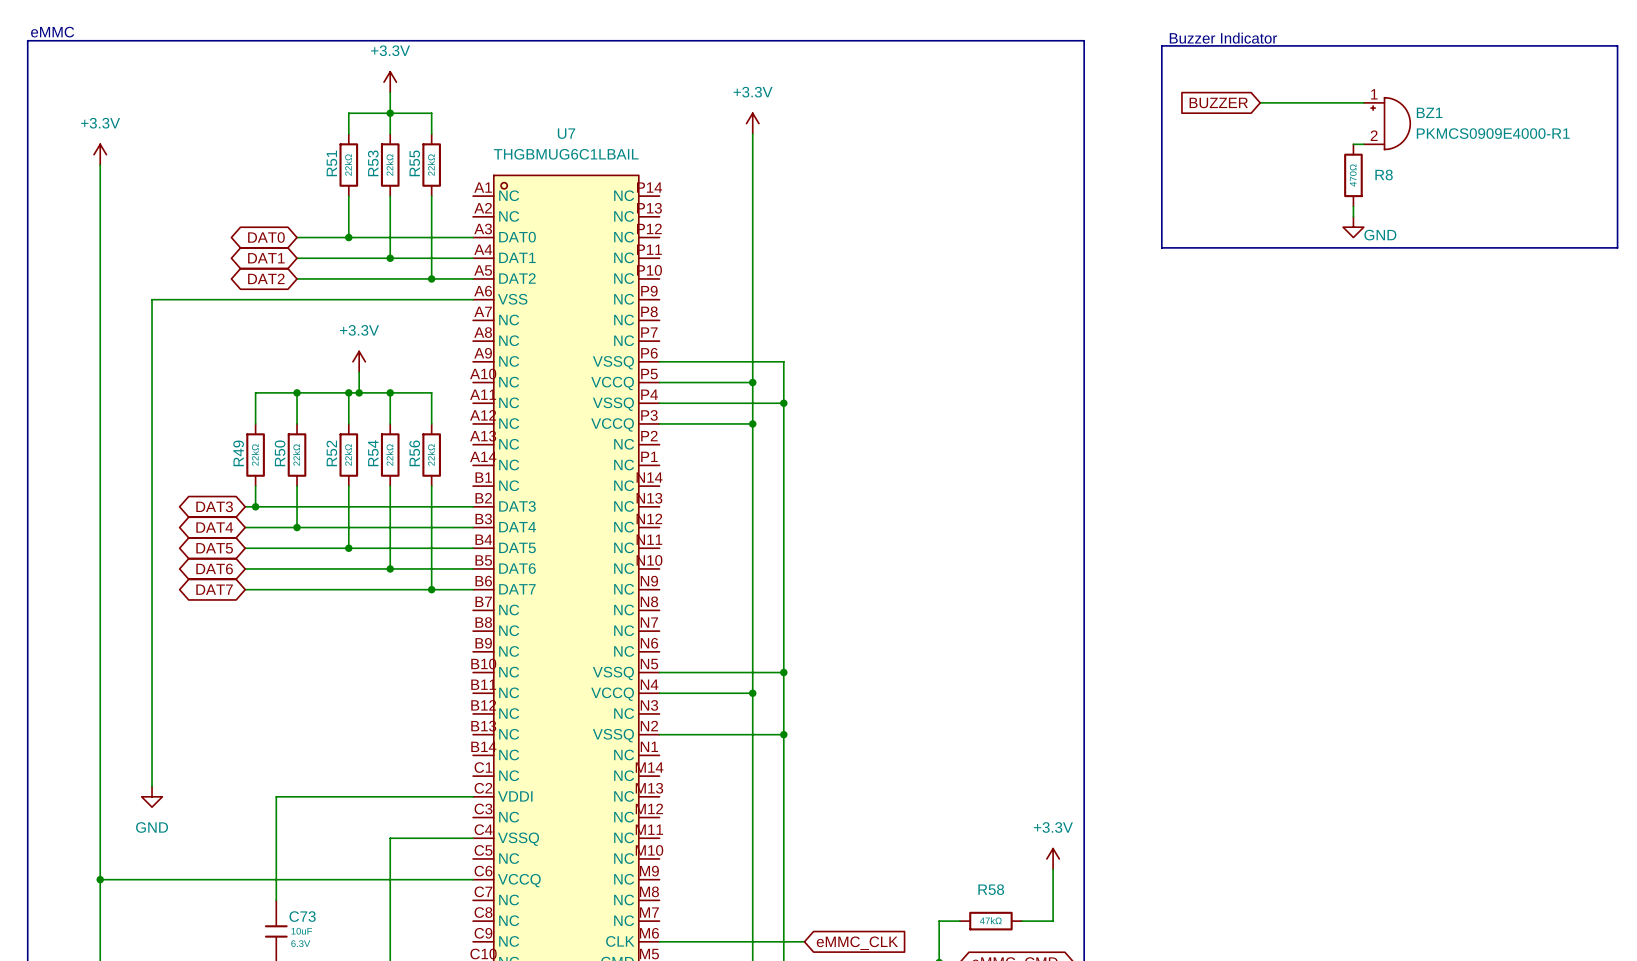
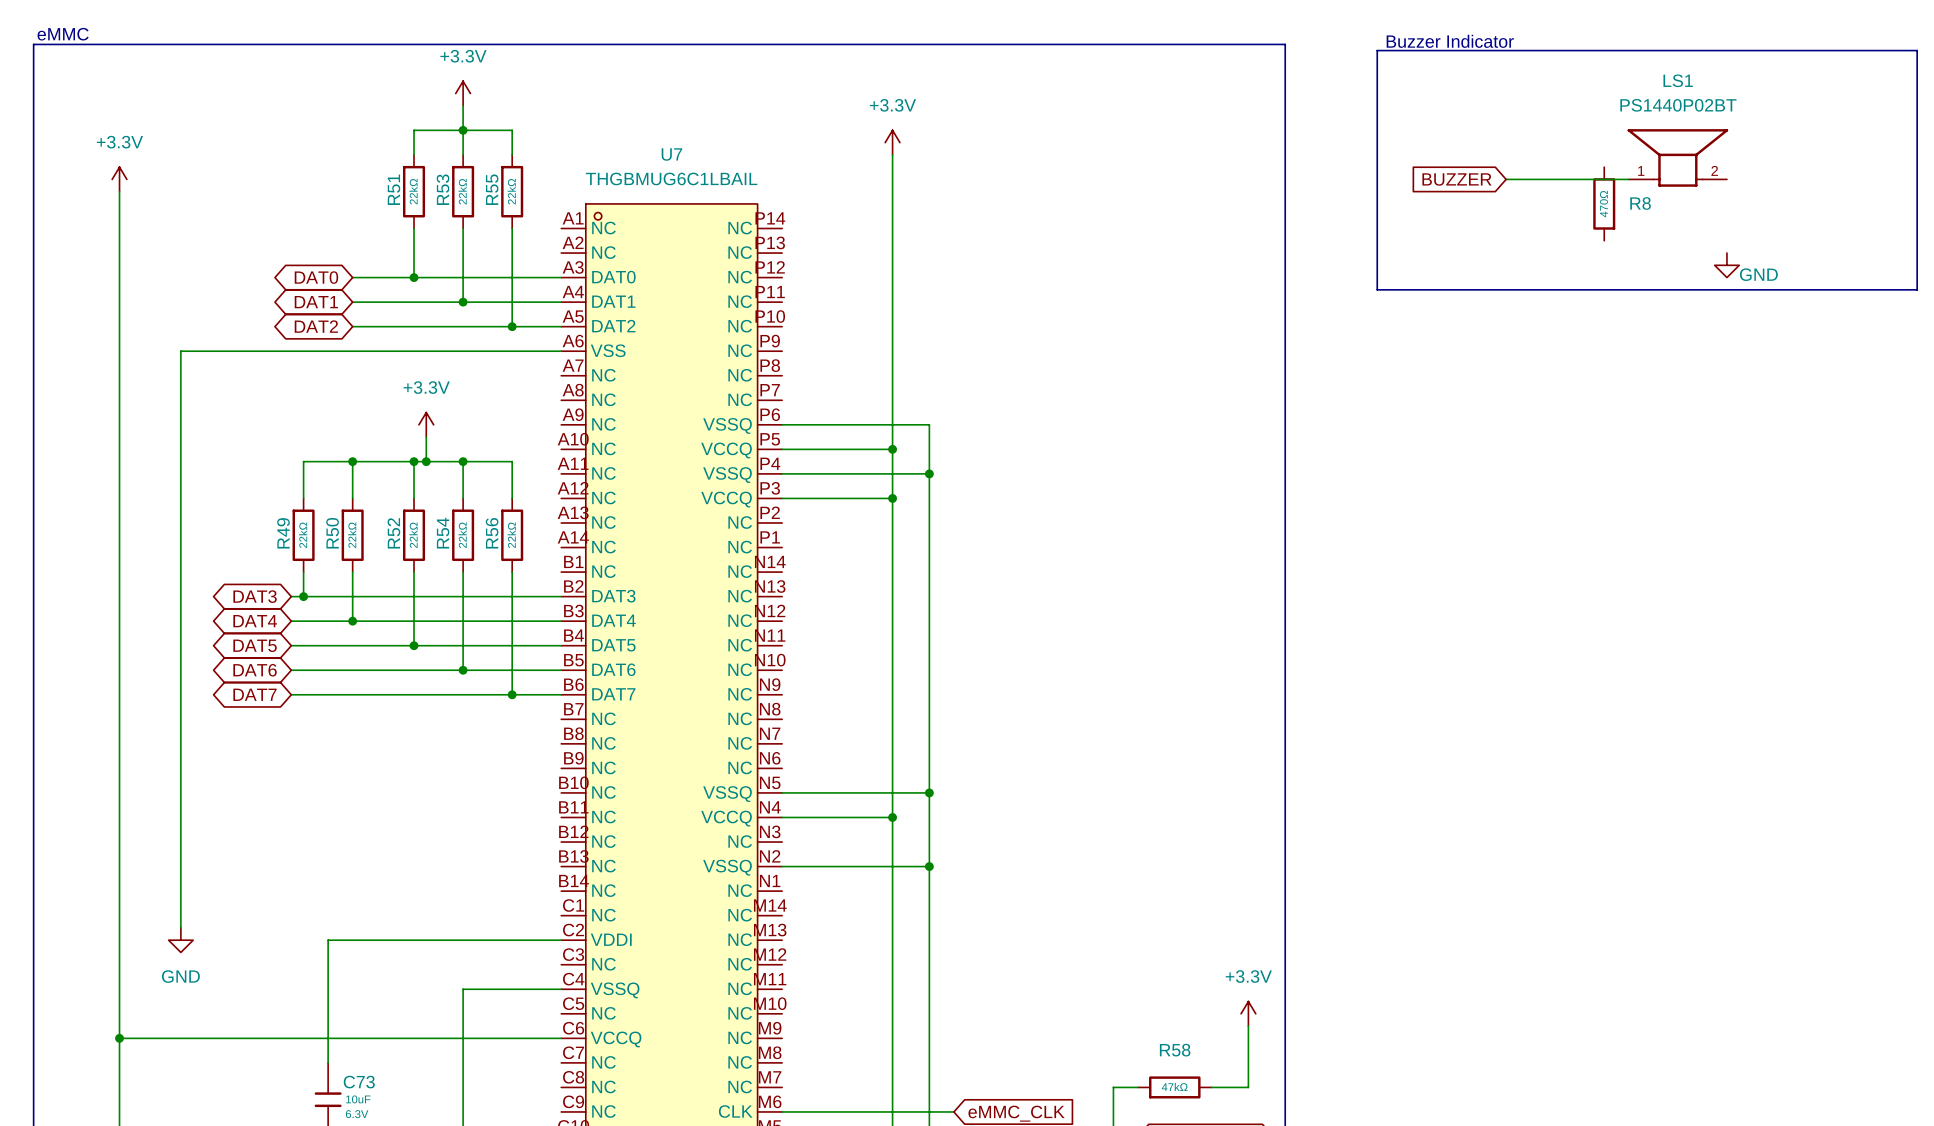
global label position: BUZZER (1218, 102) -> BUZZER (1456, 179)
wire: (1260, 102) (1363, 102) -> (1506, 179) (1628, 179)
BZ1: PKMCS0909E4000-R1 (1387, 123) -> none
LS1: none -> PS1440P02BT (1677, 157)
wire: (1353, 144) (1363, 144) -> none
wire: (1353, 206) (1353, 216) -> none
power symbol position: GND (1353, 227) -> GND (1726, 265)

